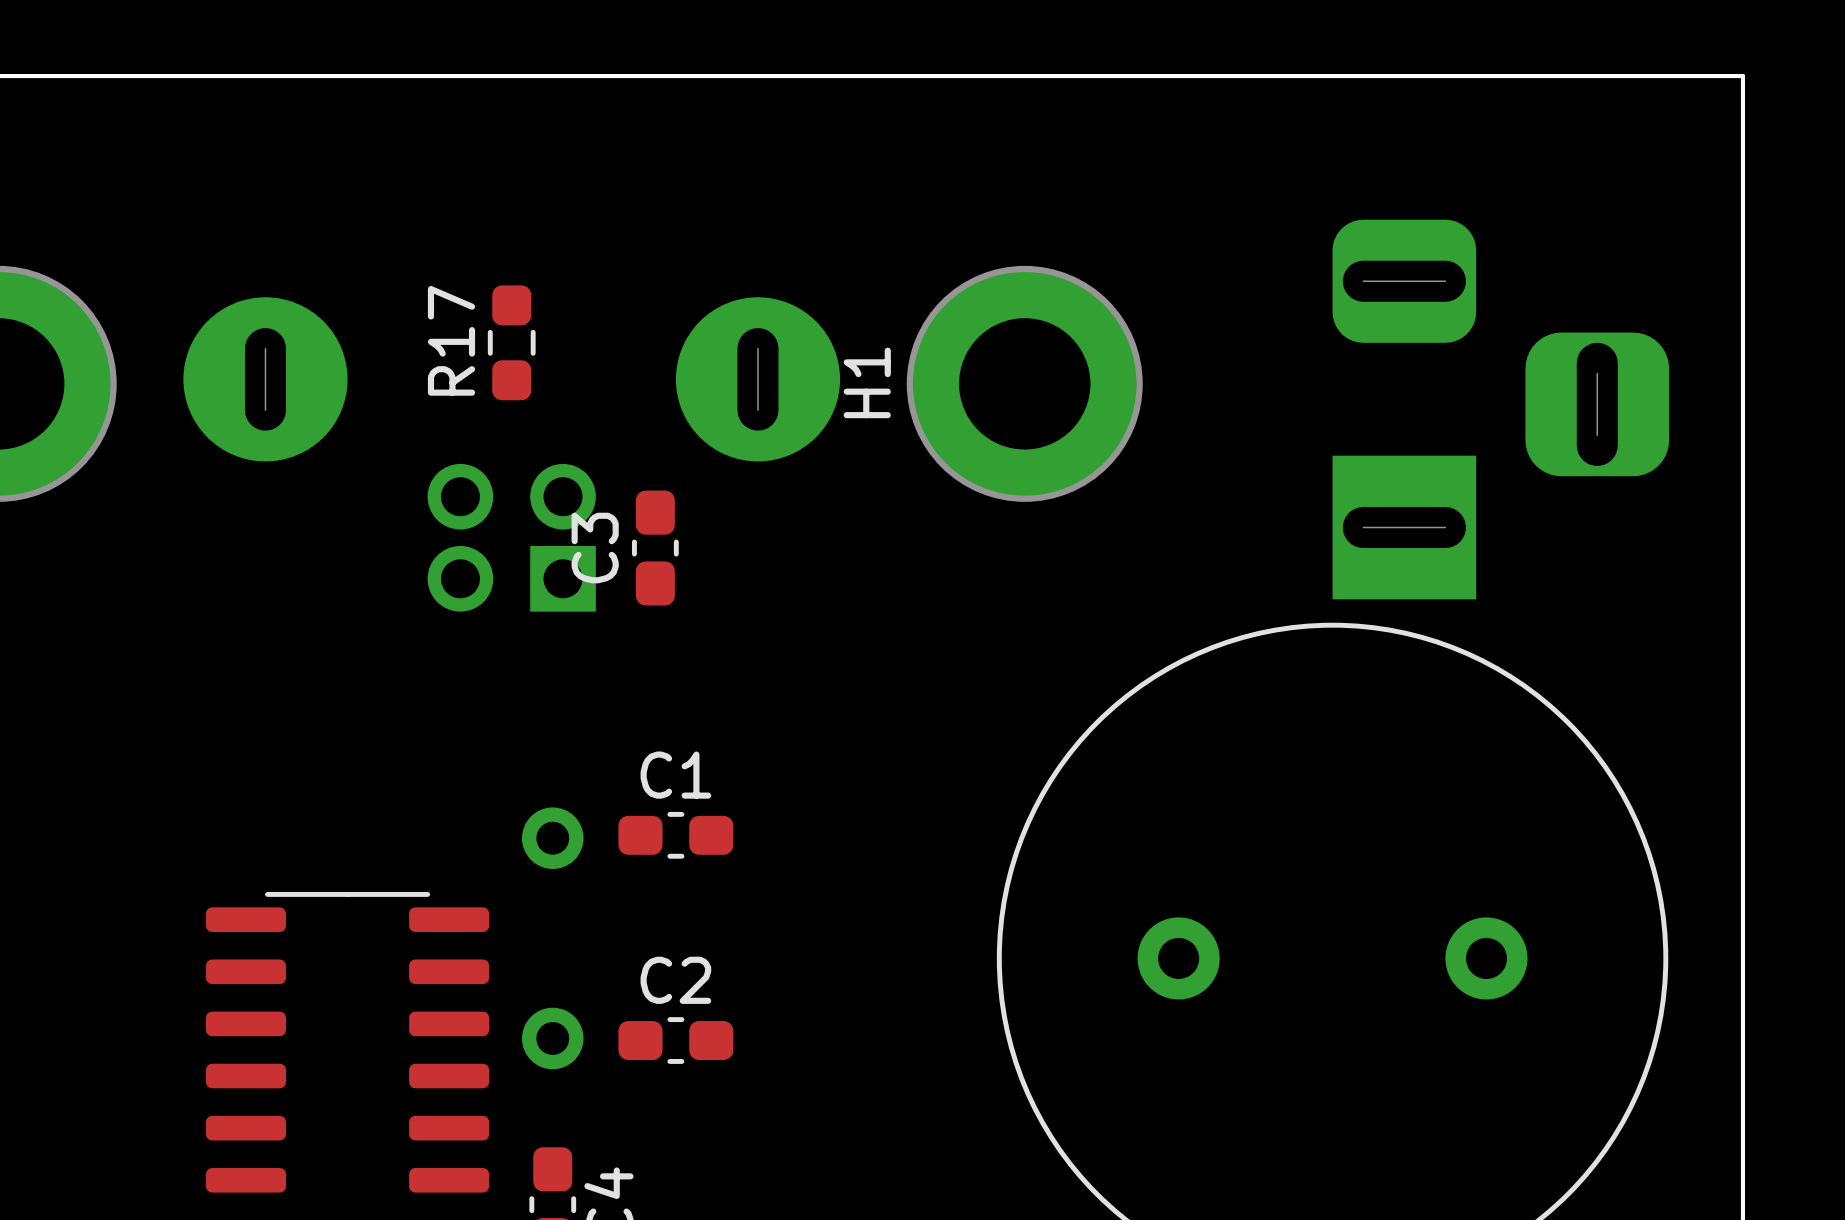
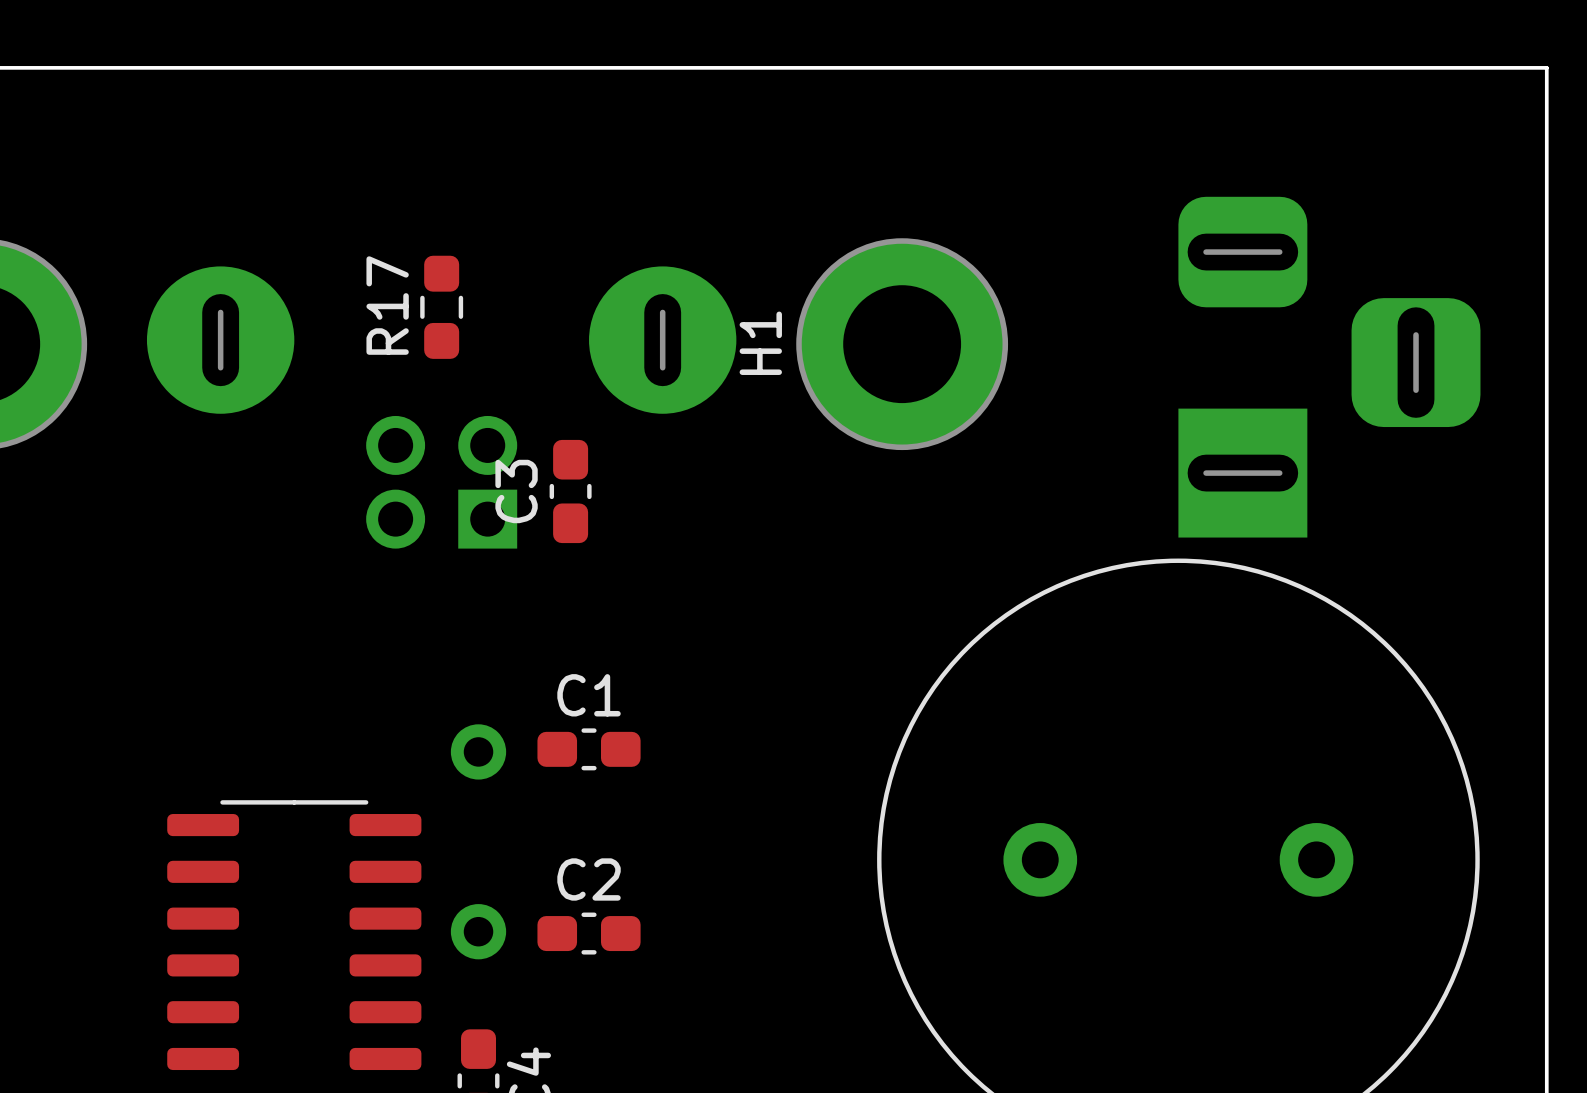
line width: thin (1363, 281) (1445, 281) -> thick (1206, 252) (1279, 252)
line width: thin (265, 348) (265, 410) -> thick (220, 312) (220, 367)
line width: thin (757, 348) (757, 410) -> thick (662, 312) (662, 367)
line width: thin (1597, 373) (1597, 435) -> thick (1416, 334) (1416, 390)
line width: thin (1363, 527) (1445, 527) -> thick (1206, 473) (1279, 473)

